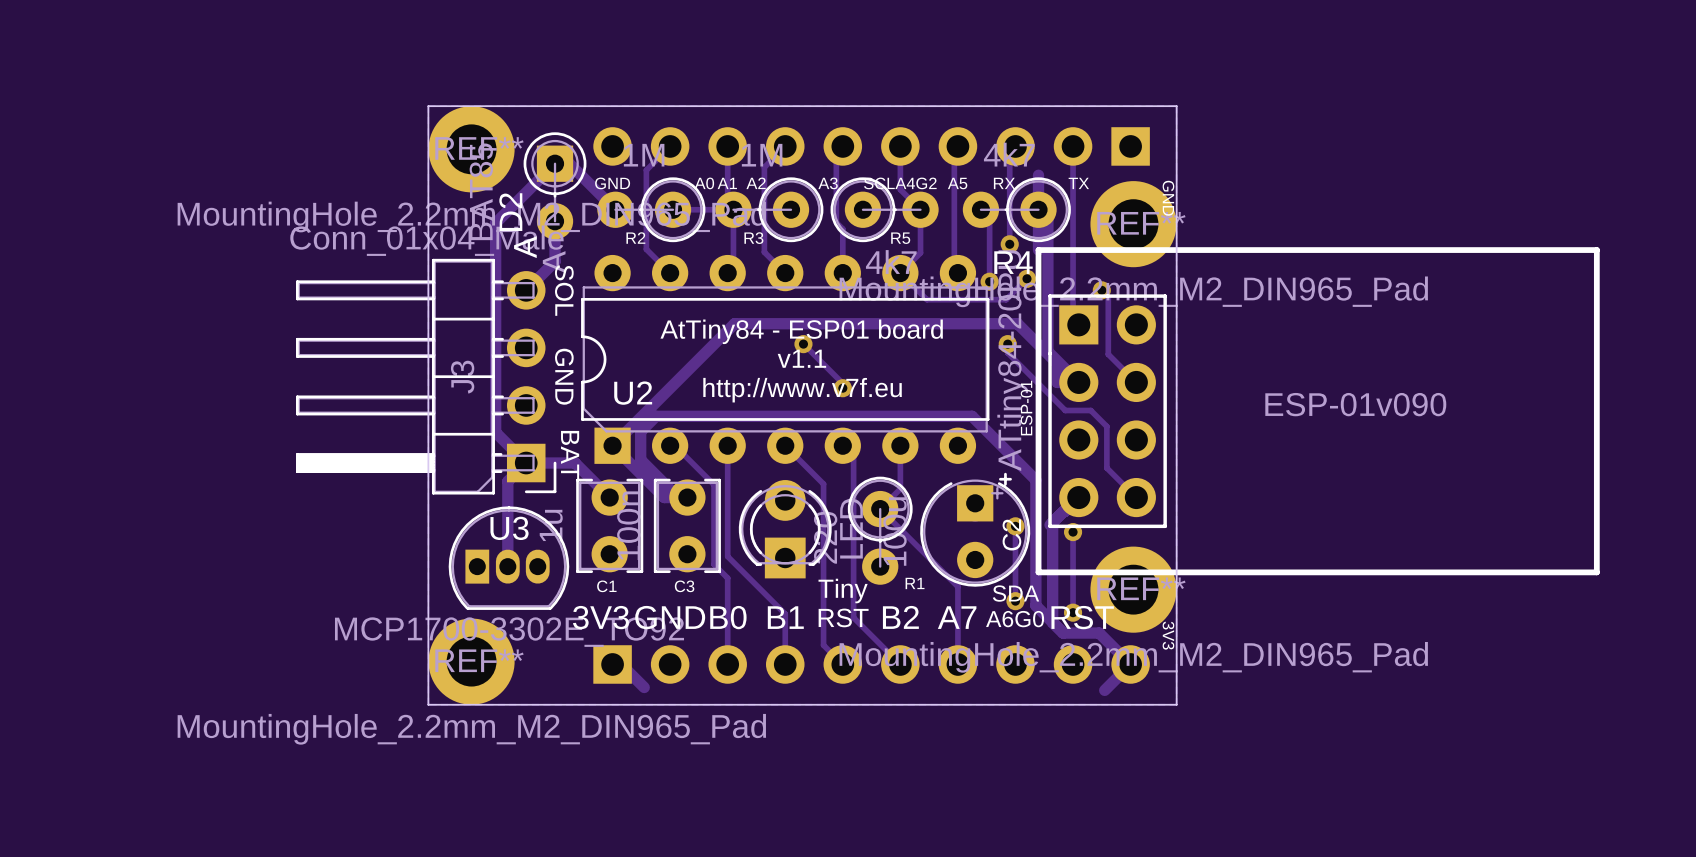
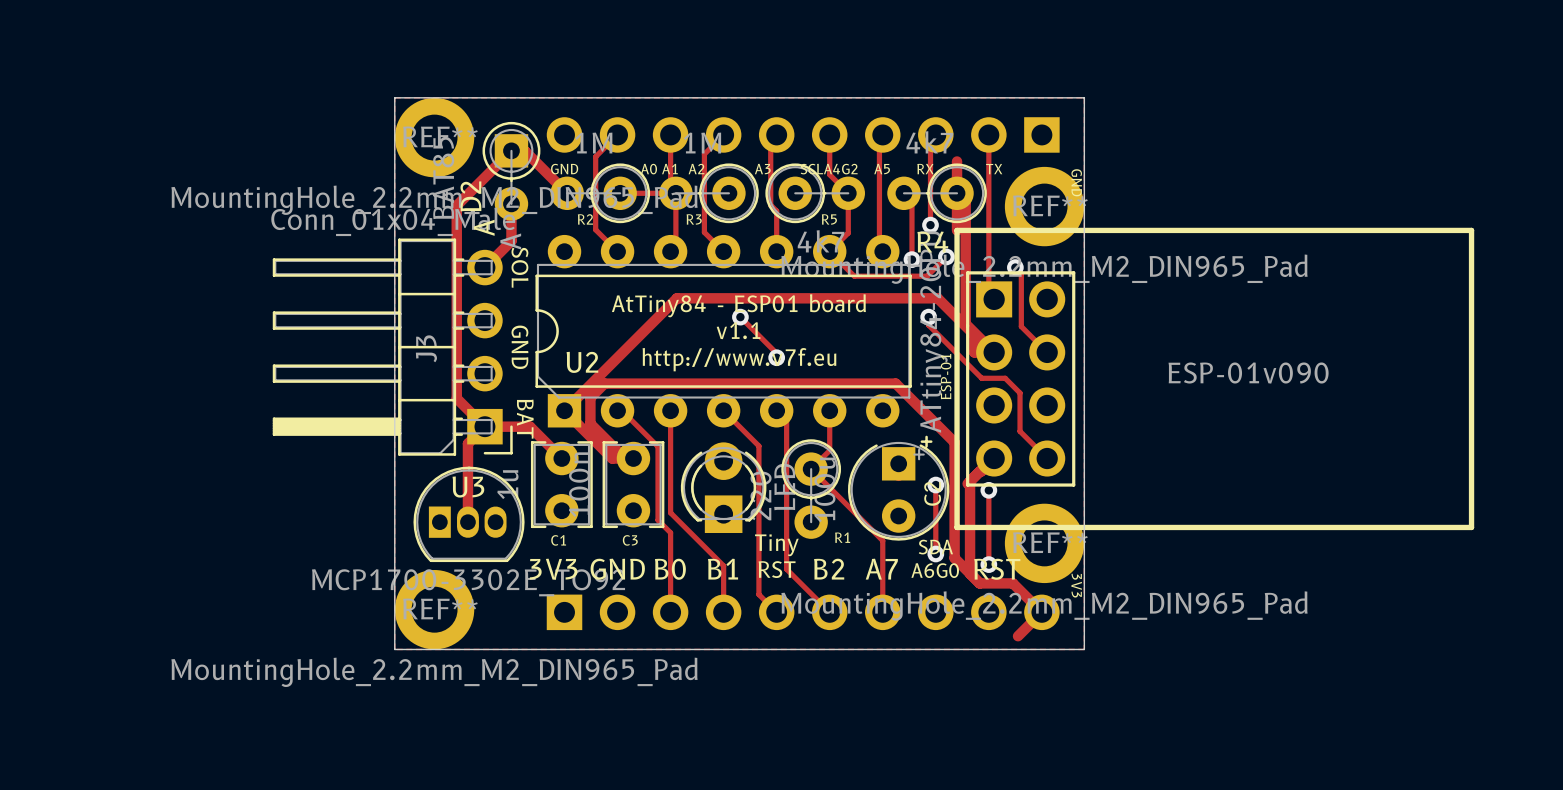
track: (621, 664) (644, 687) -> none

